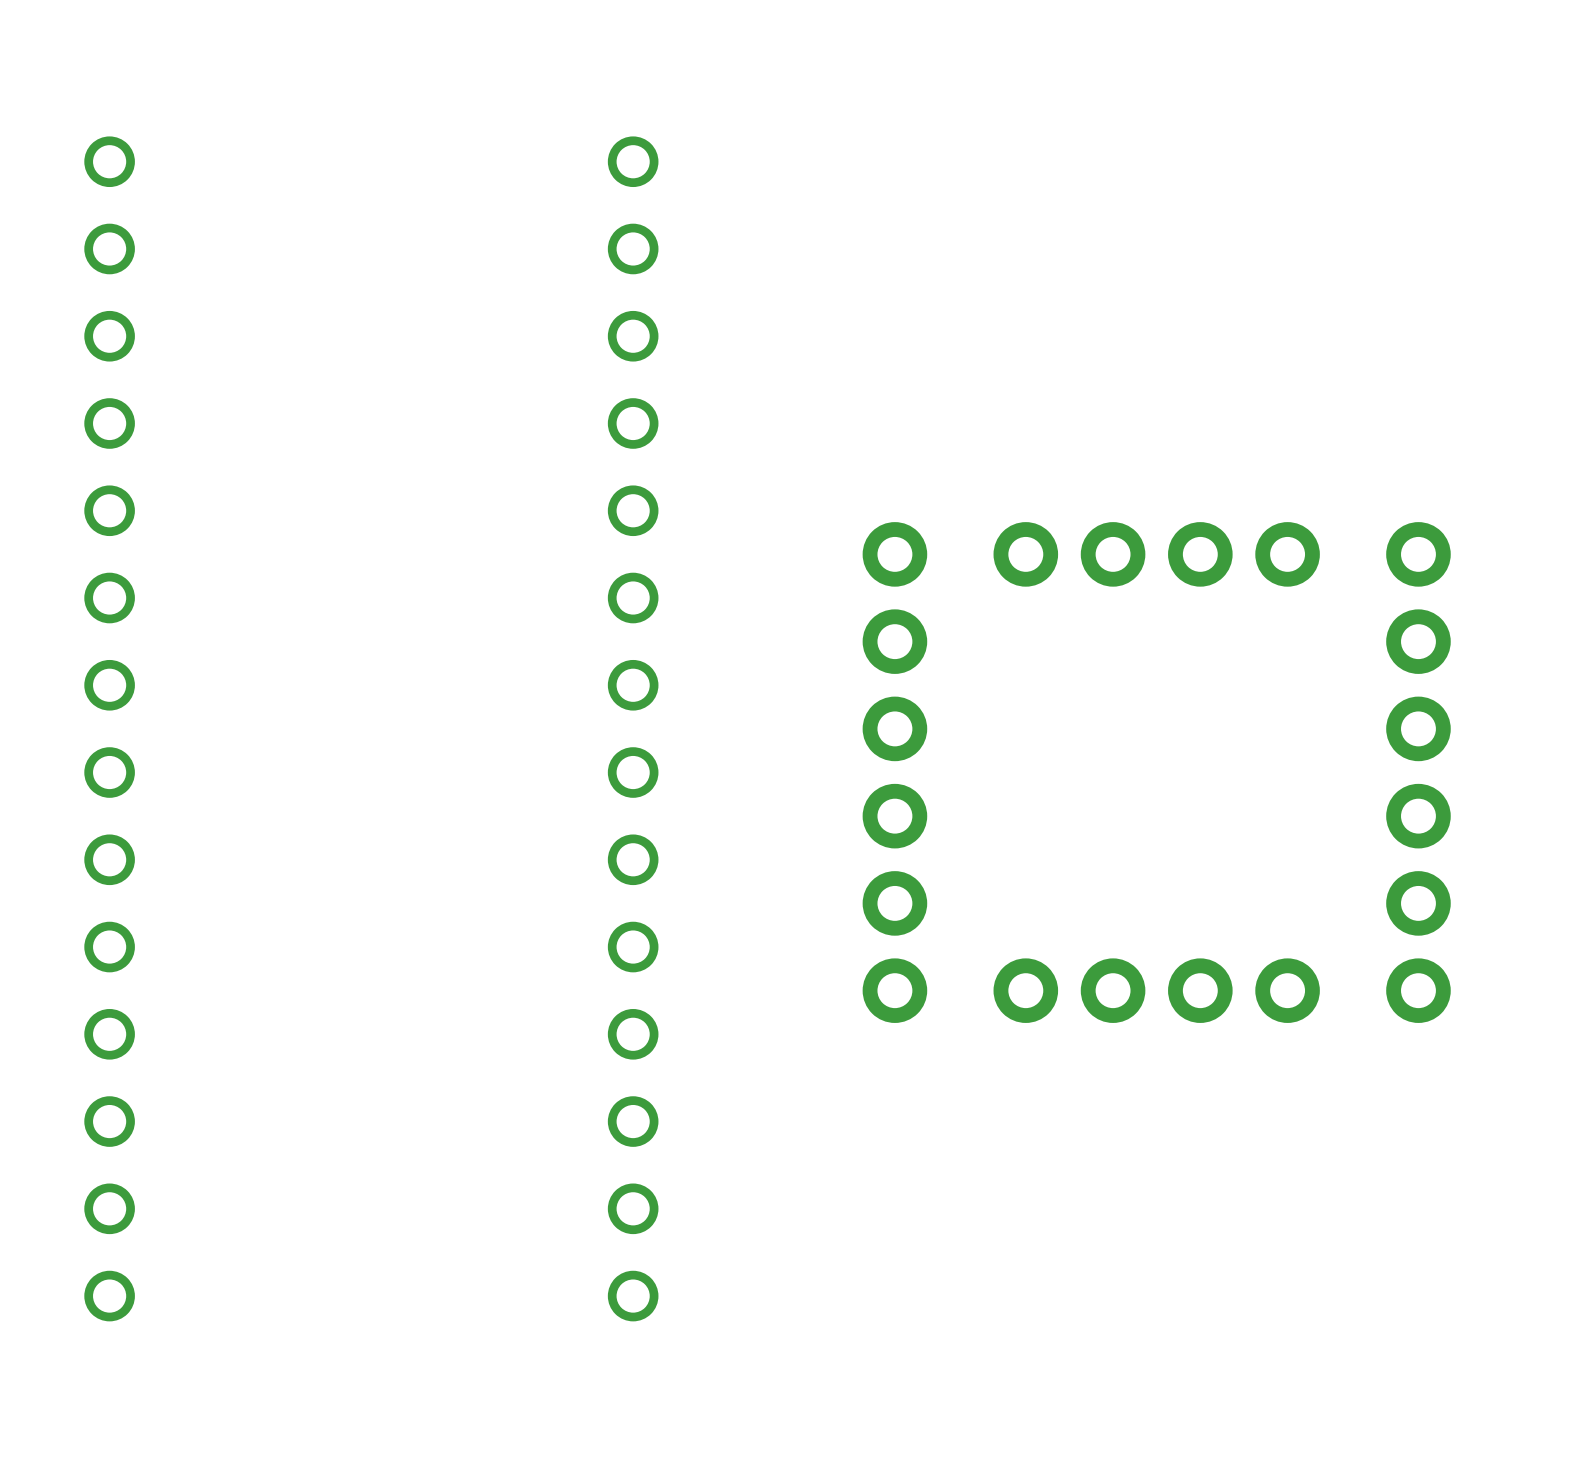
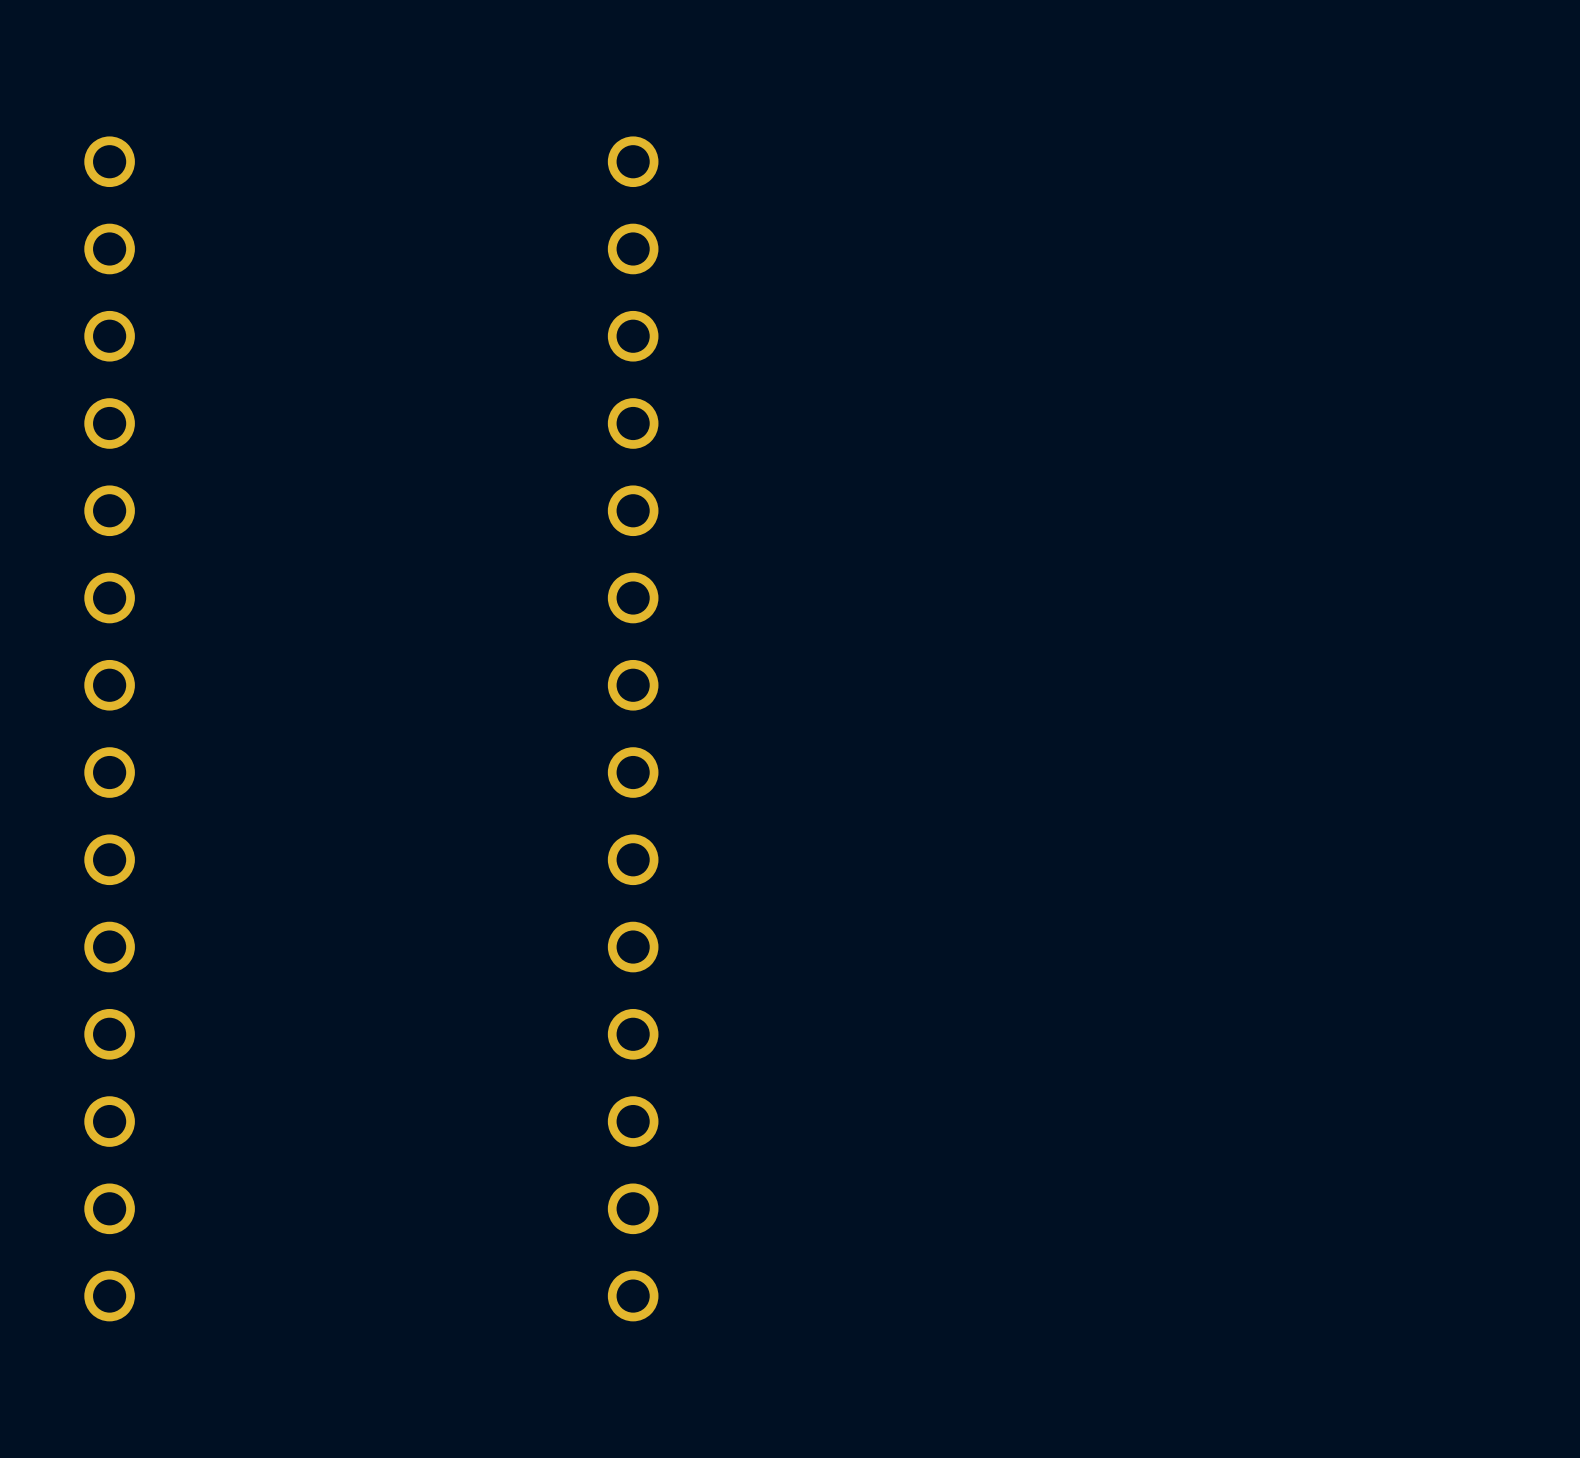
part: (1156, 554) -> none
part: (894, 772) -> none
part: (1418, 772) -> none
part: (1156, 990) -> none

